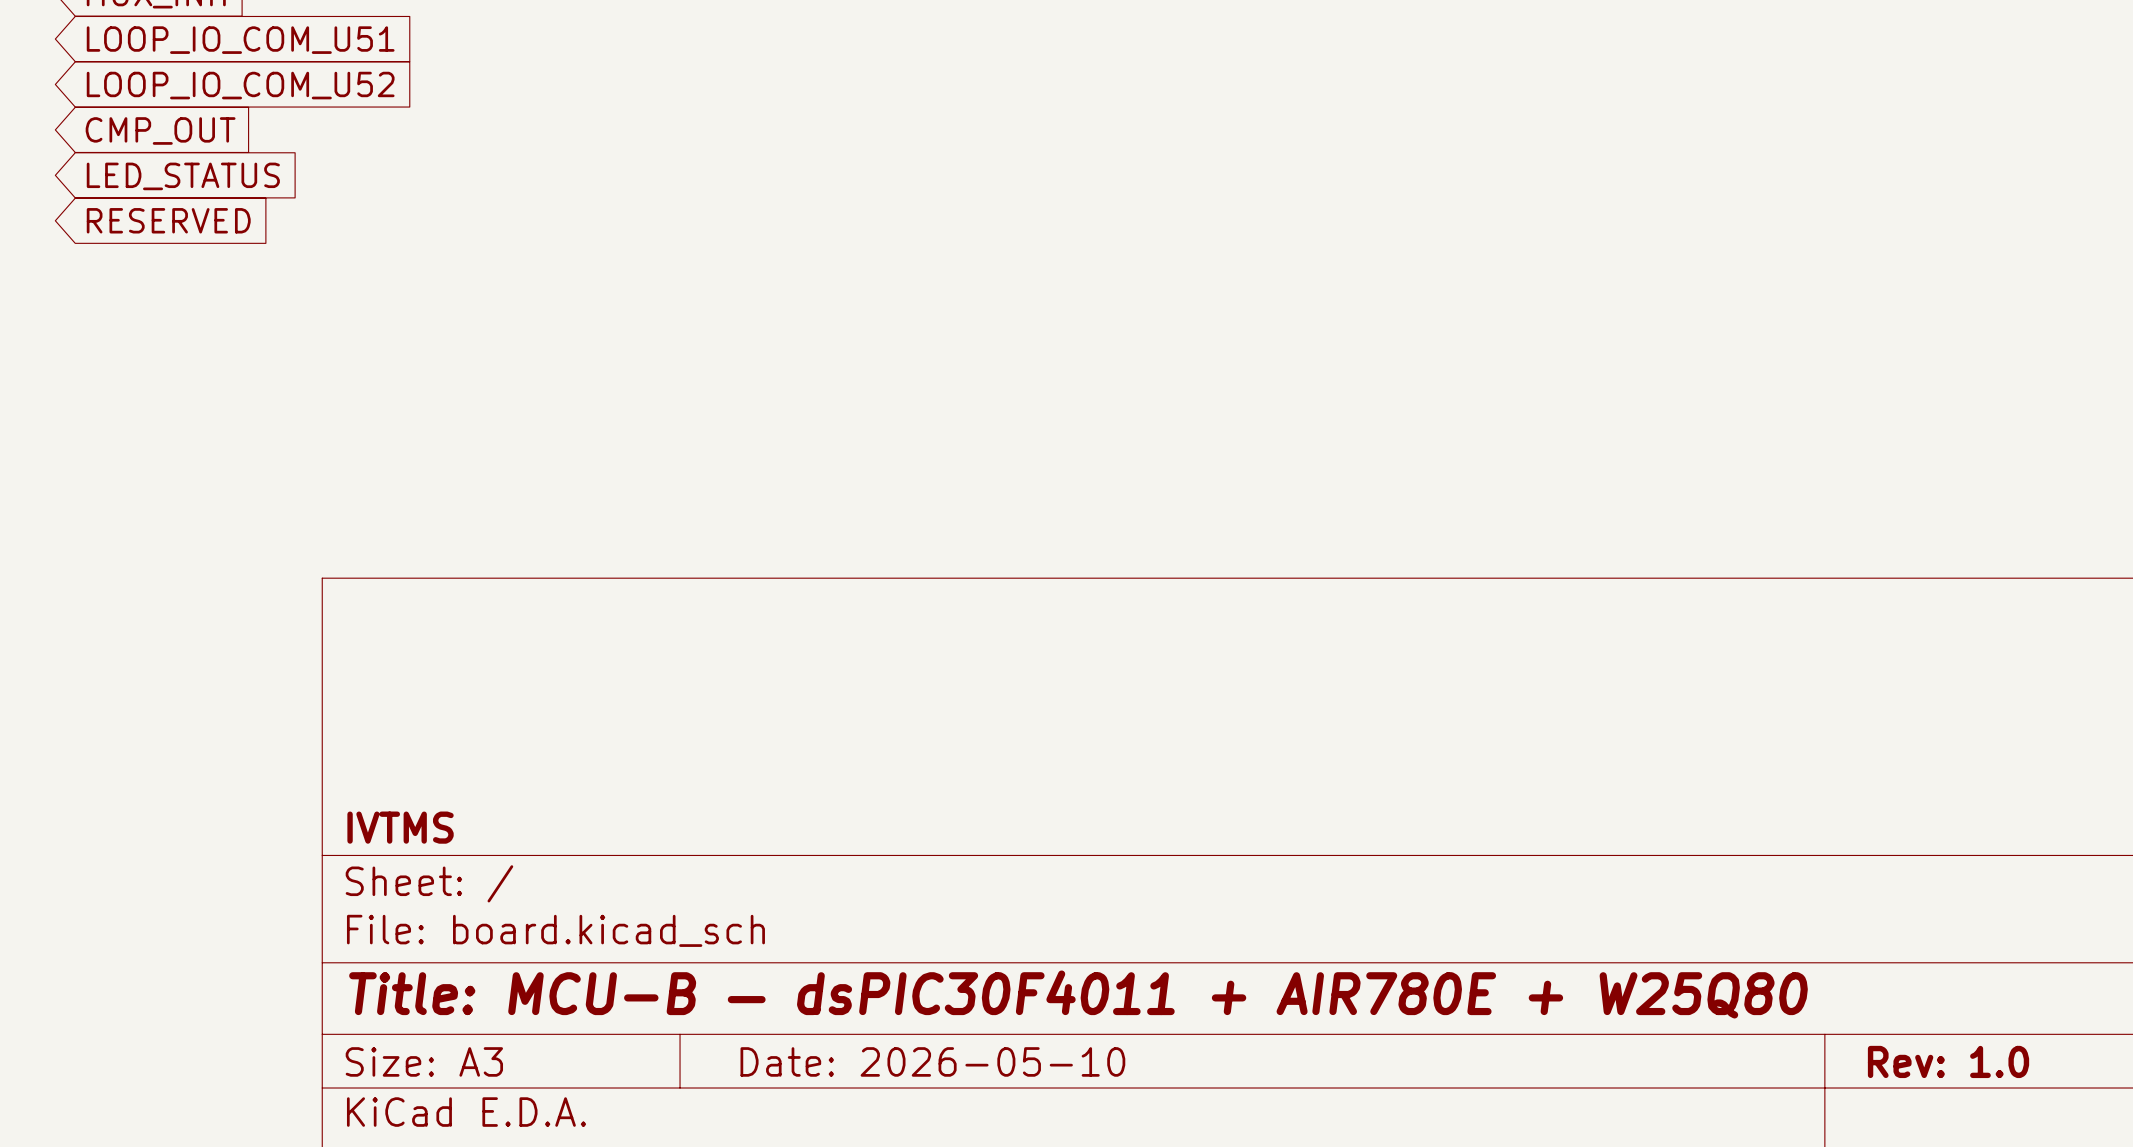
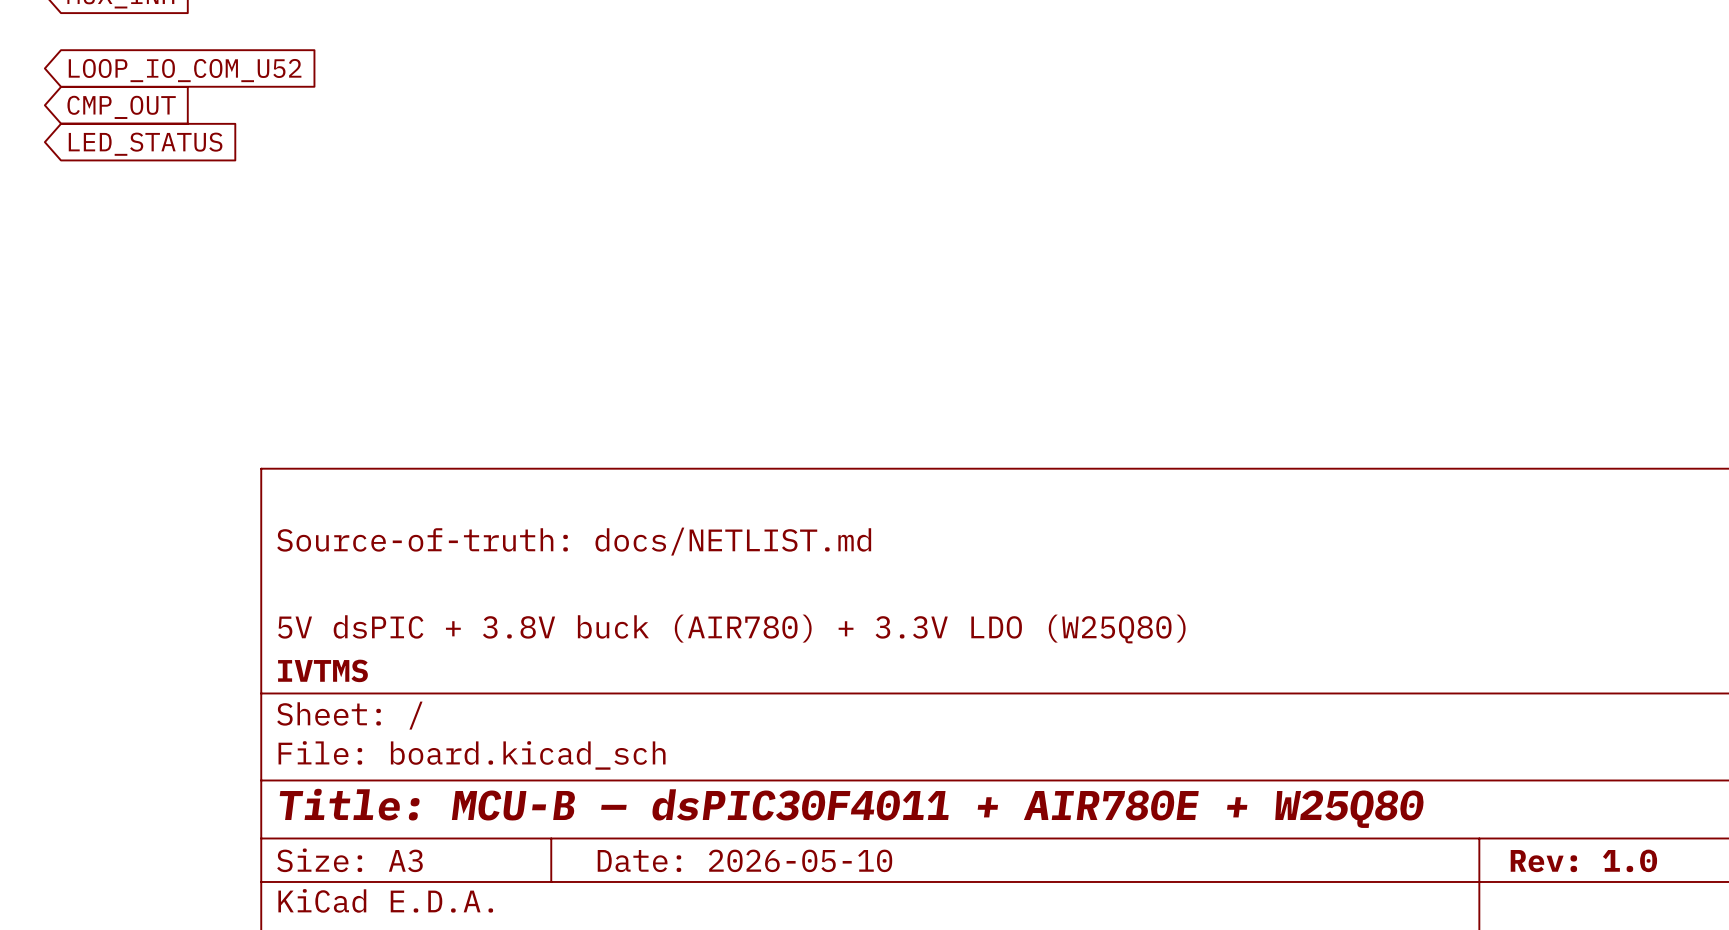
global label: LOOP_IO_COM_U51 (240, 40) -> none
global label: RESERVED (168, 220) -> none
title block: none -> Source-of-truth: docs/NETLIST.md (574, 541)
title block: none -> 5V dsPIC + 3.8V buck (AIR780) + 3.3V LDO (W25Q80) (731, 629)

